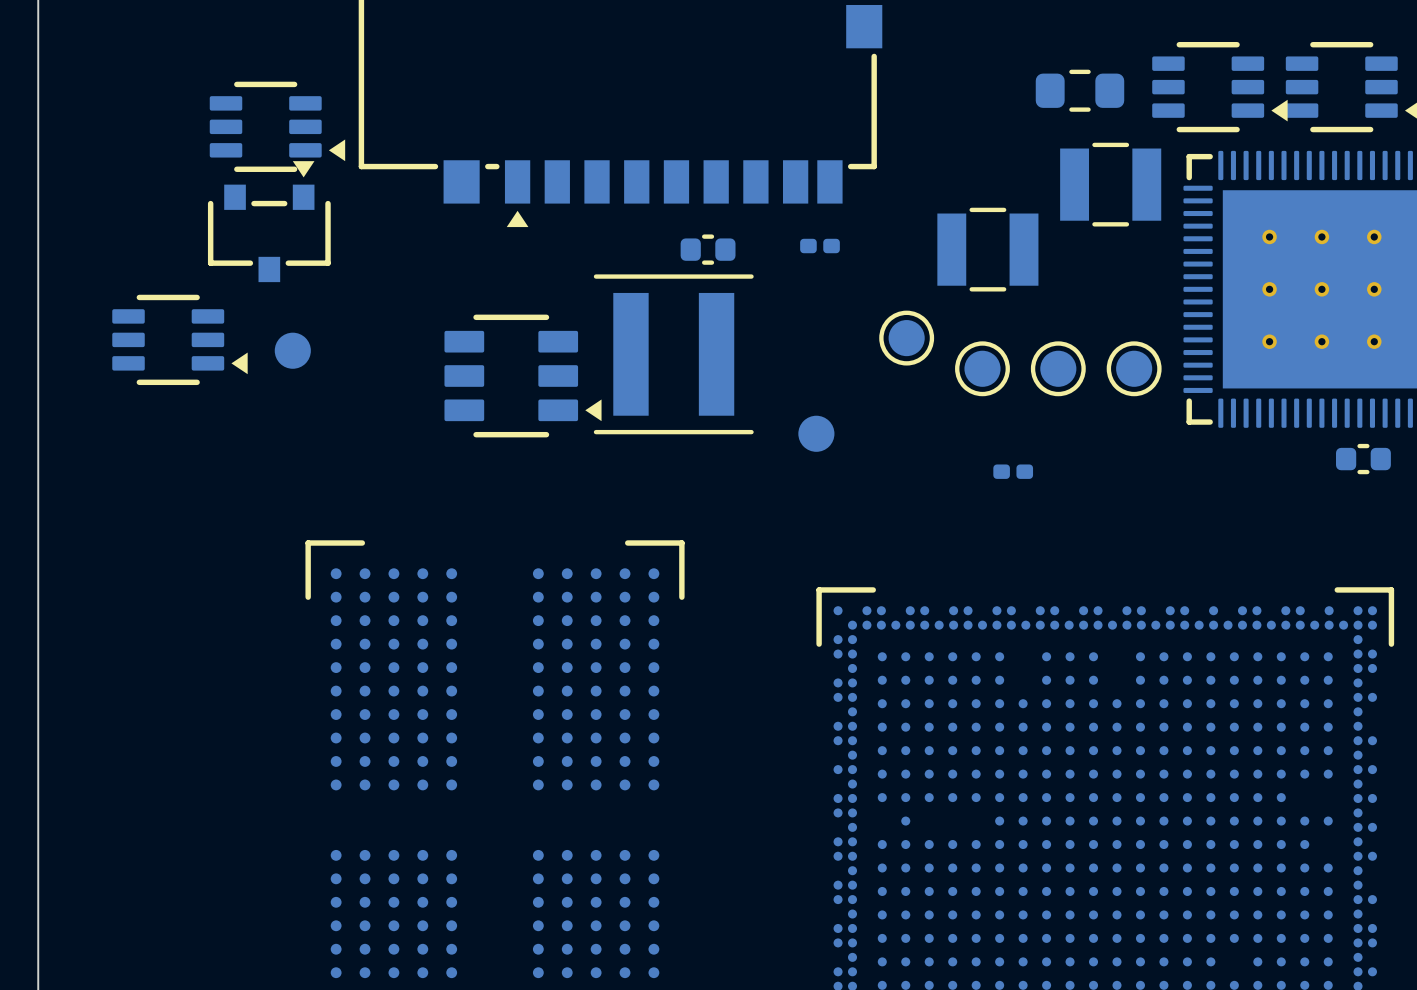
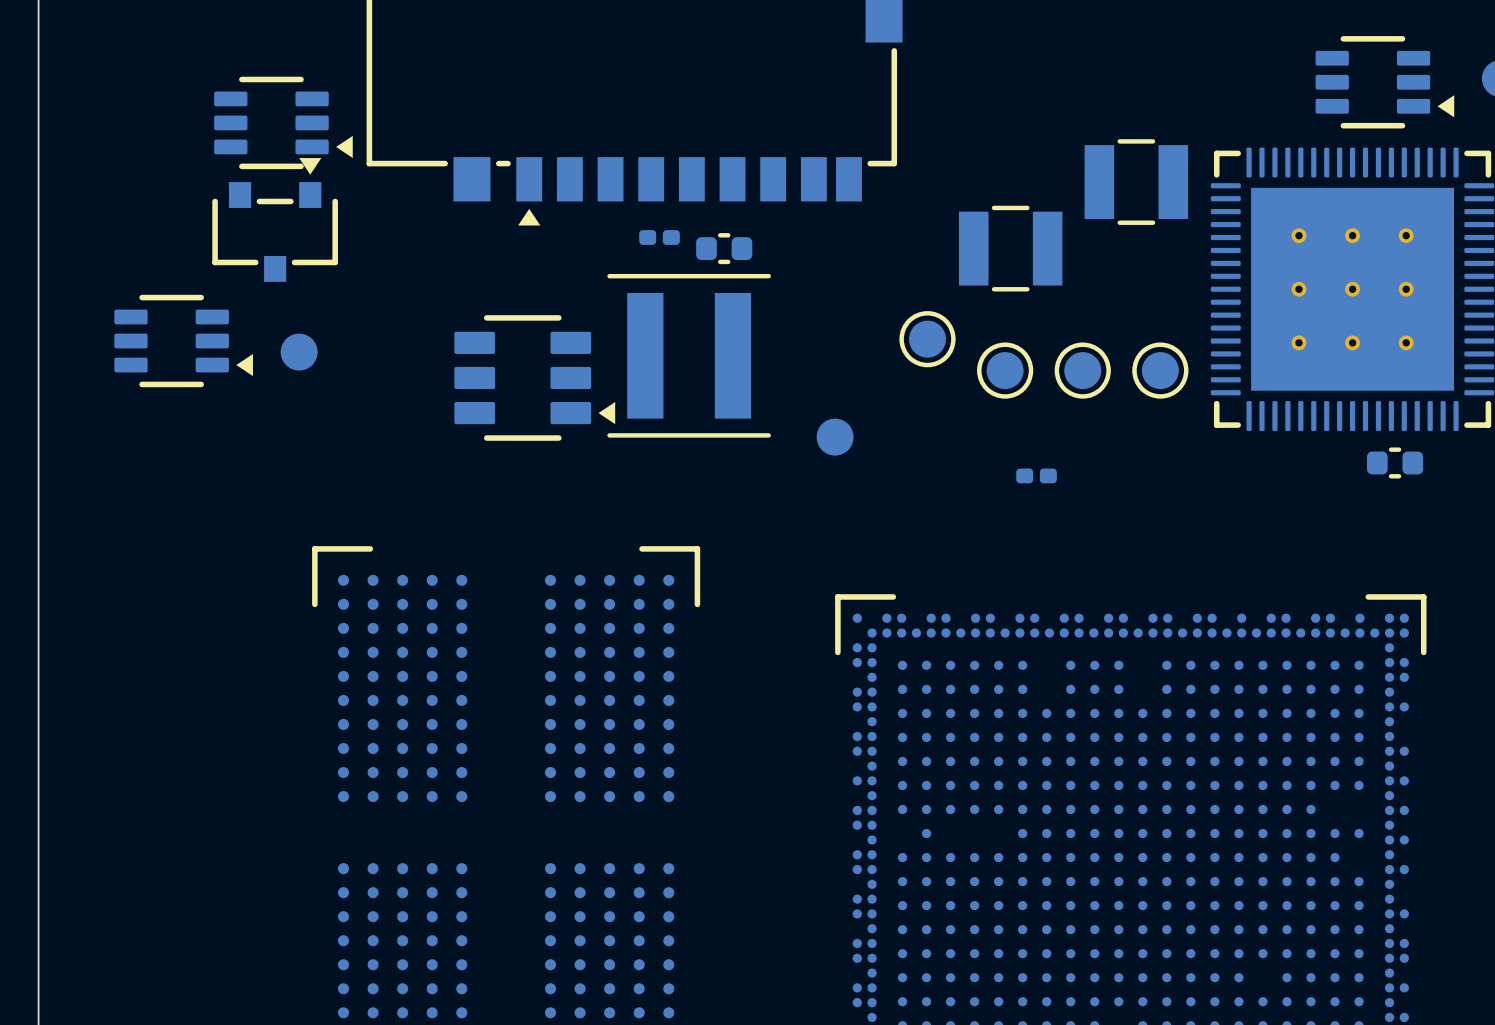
part: (1219, 87) -> none
part: (1079, 90) -> none
part position: (820, 246) -> (659, 237)

